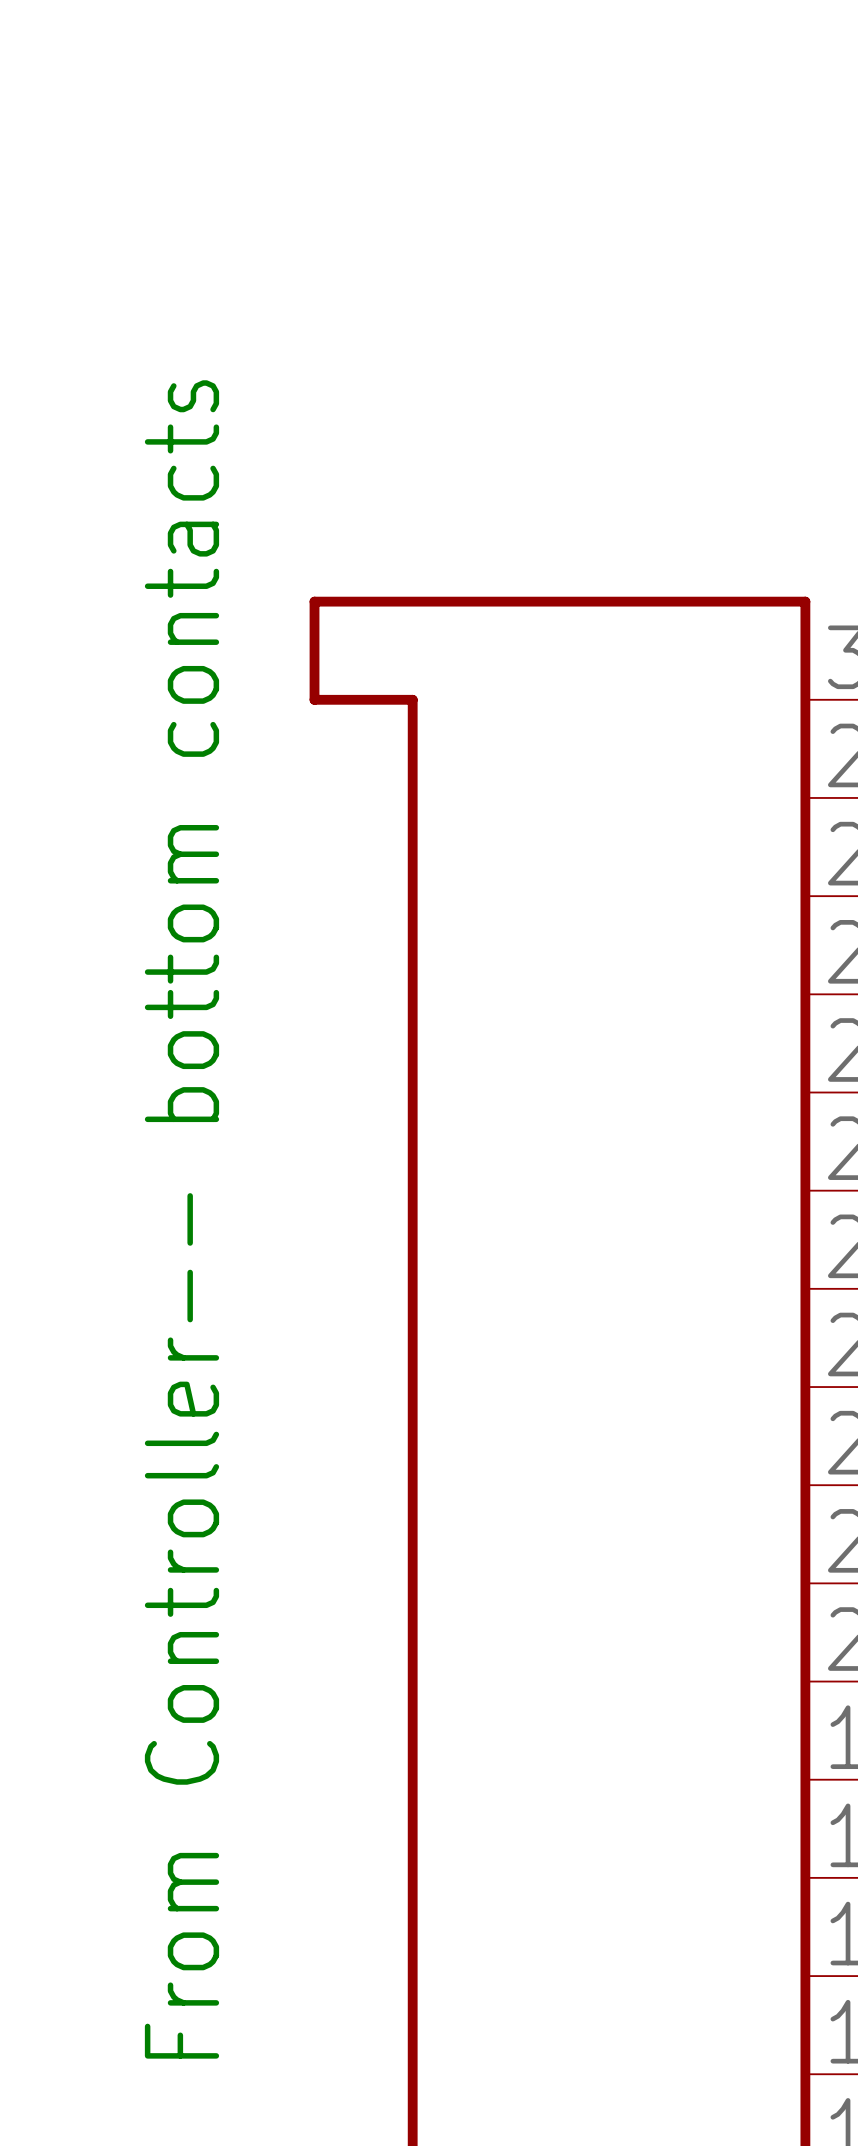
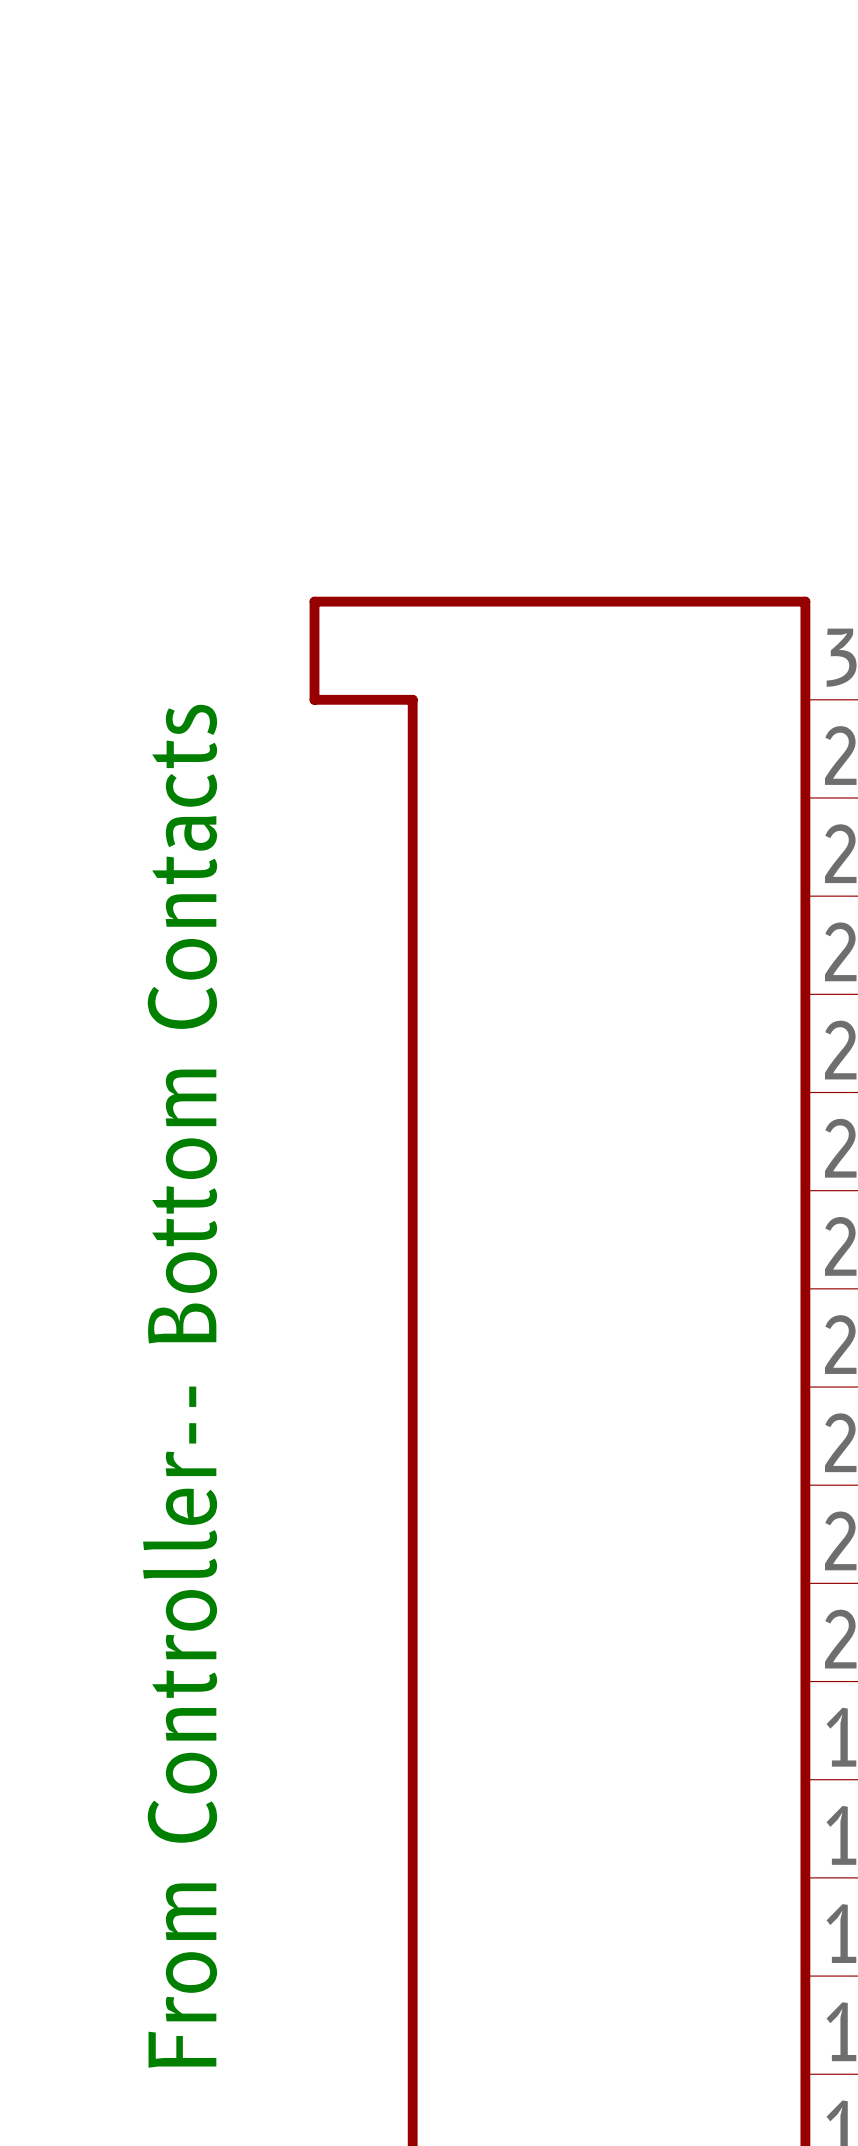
text: From Controller-- bottom contacts (181, 1219) -> From Controller-- Bottom Contacts (180, 1386)

